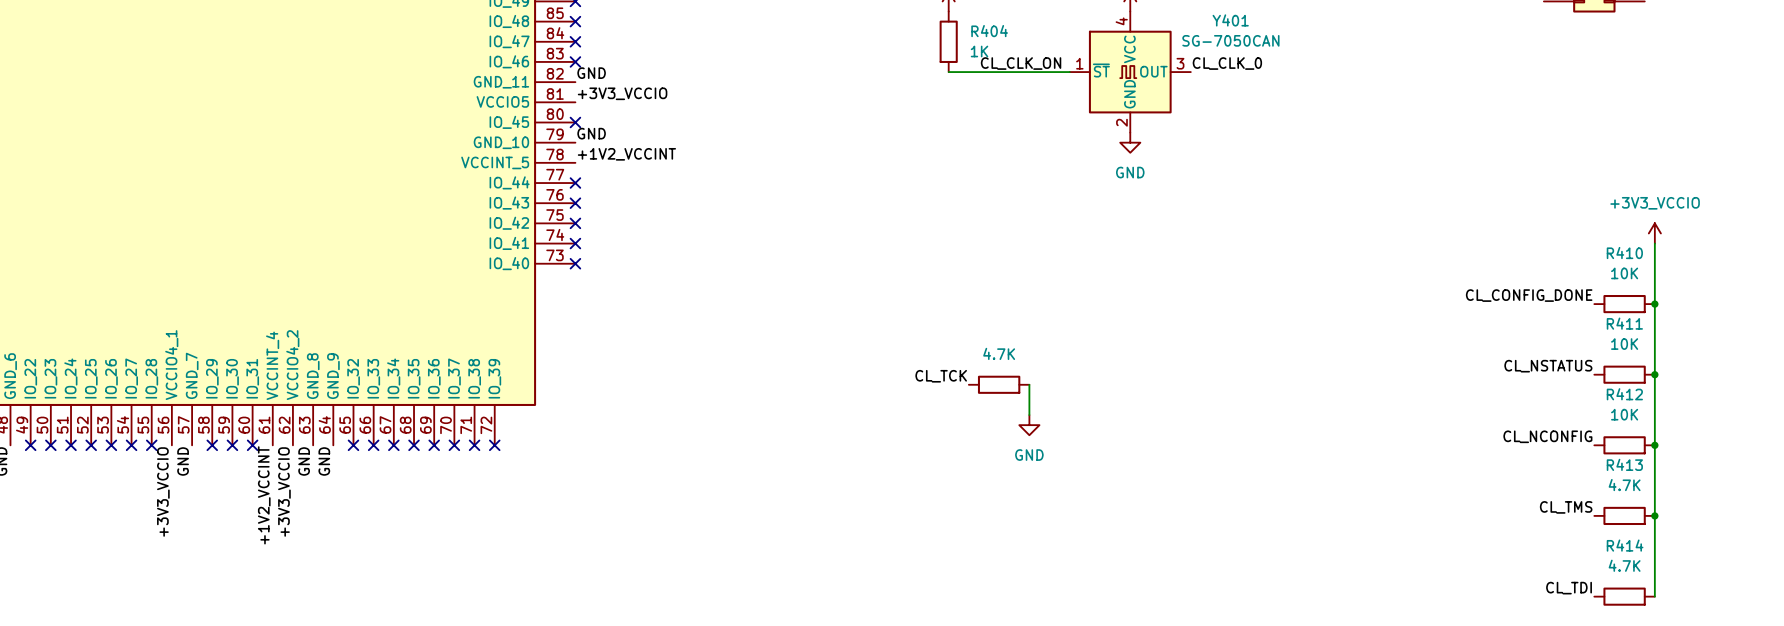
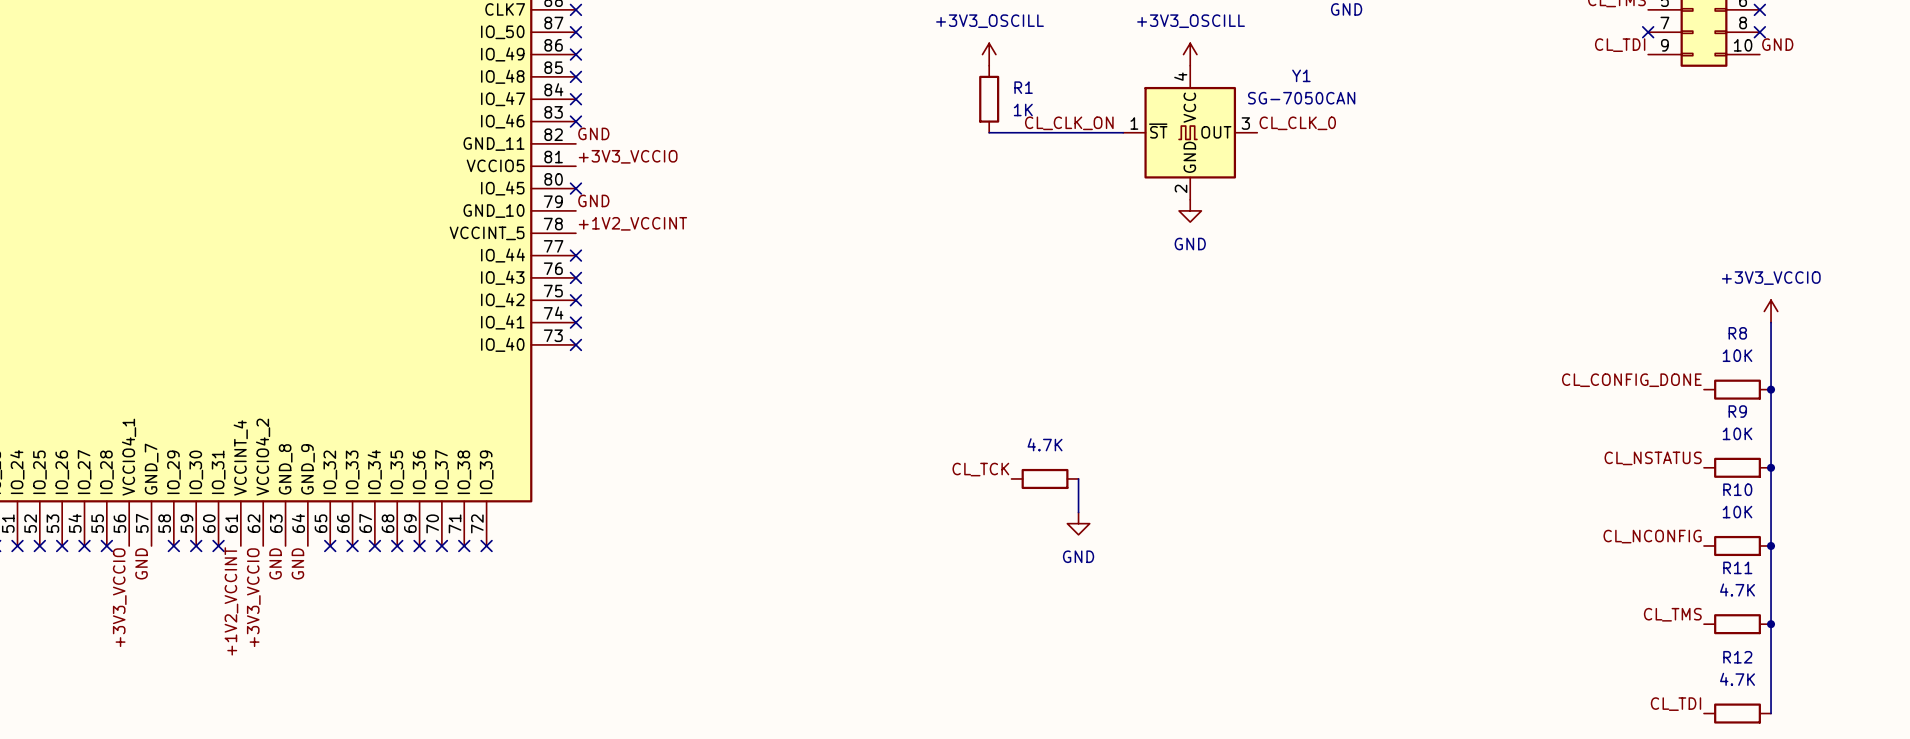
Y401 name: Y401 (1230, 20) -> Y1 (1301, 75)
R404 name: R404 (989, 31) -> R1 (1023, 87)
R410 name: R410 (1624, 253) -> R8 (1737, 333)
R411 name: R411 (1624, 323) -> R9 (1737, 411)
R412 name: R412 (1624, 394) -> R10 (1737, 489)
R413 name: R413 (1624, 464) -> R11 (1737, 567)
R414 name: R414 (1625, 545) -> R12 (1737, 657)

